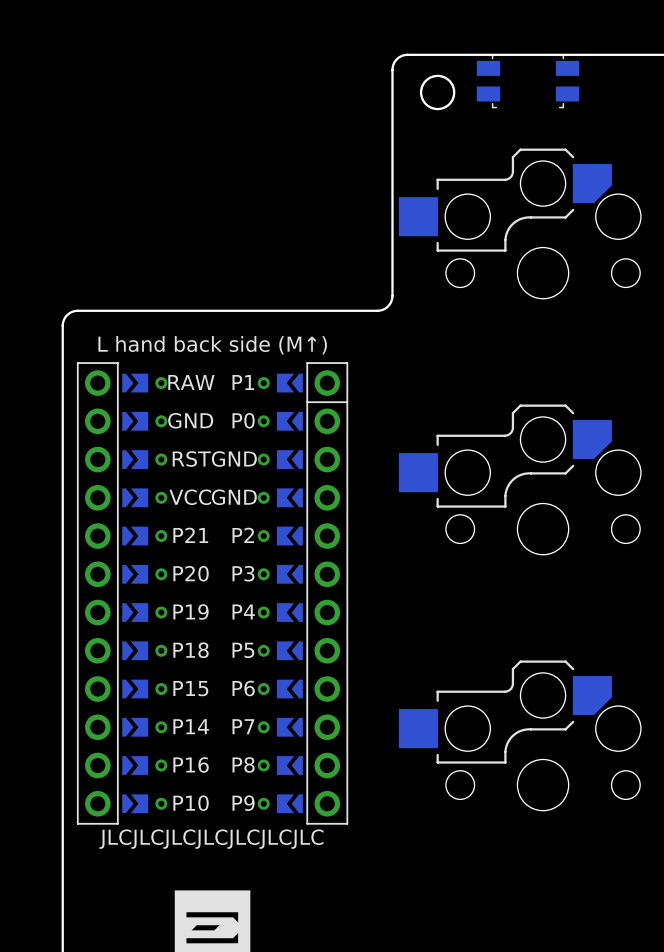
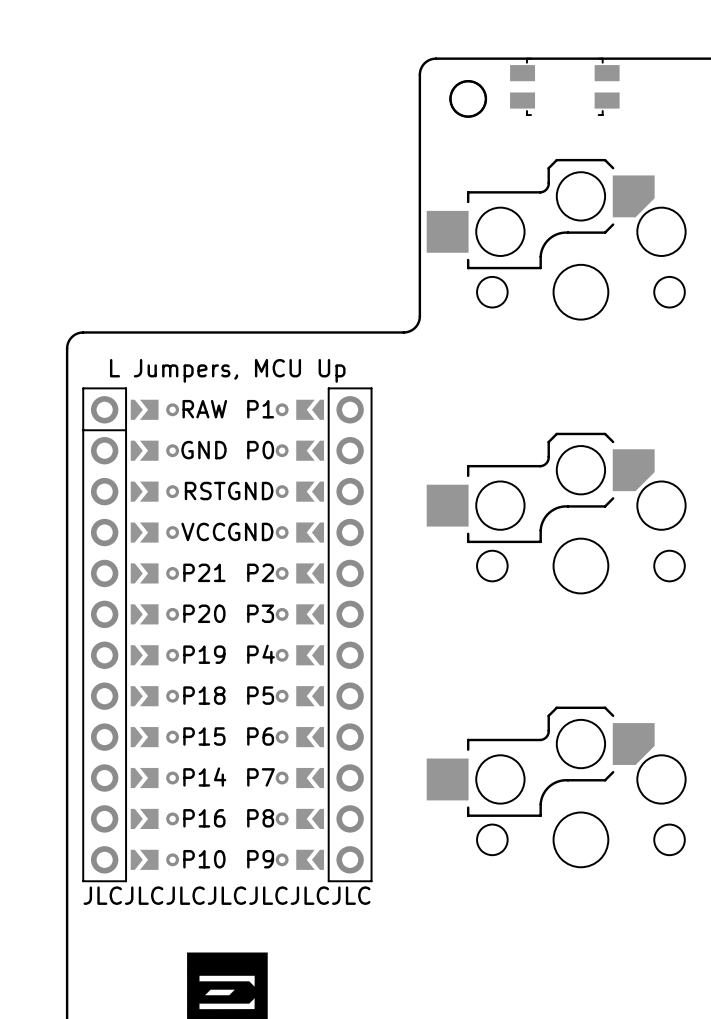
part footprint: [76, 362, 349, 825] -> [82, 387, 373, 883]

